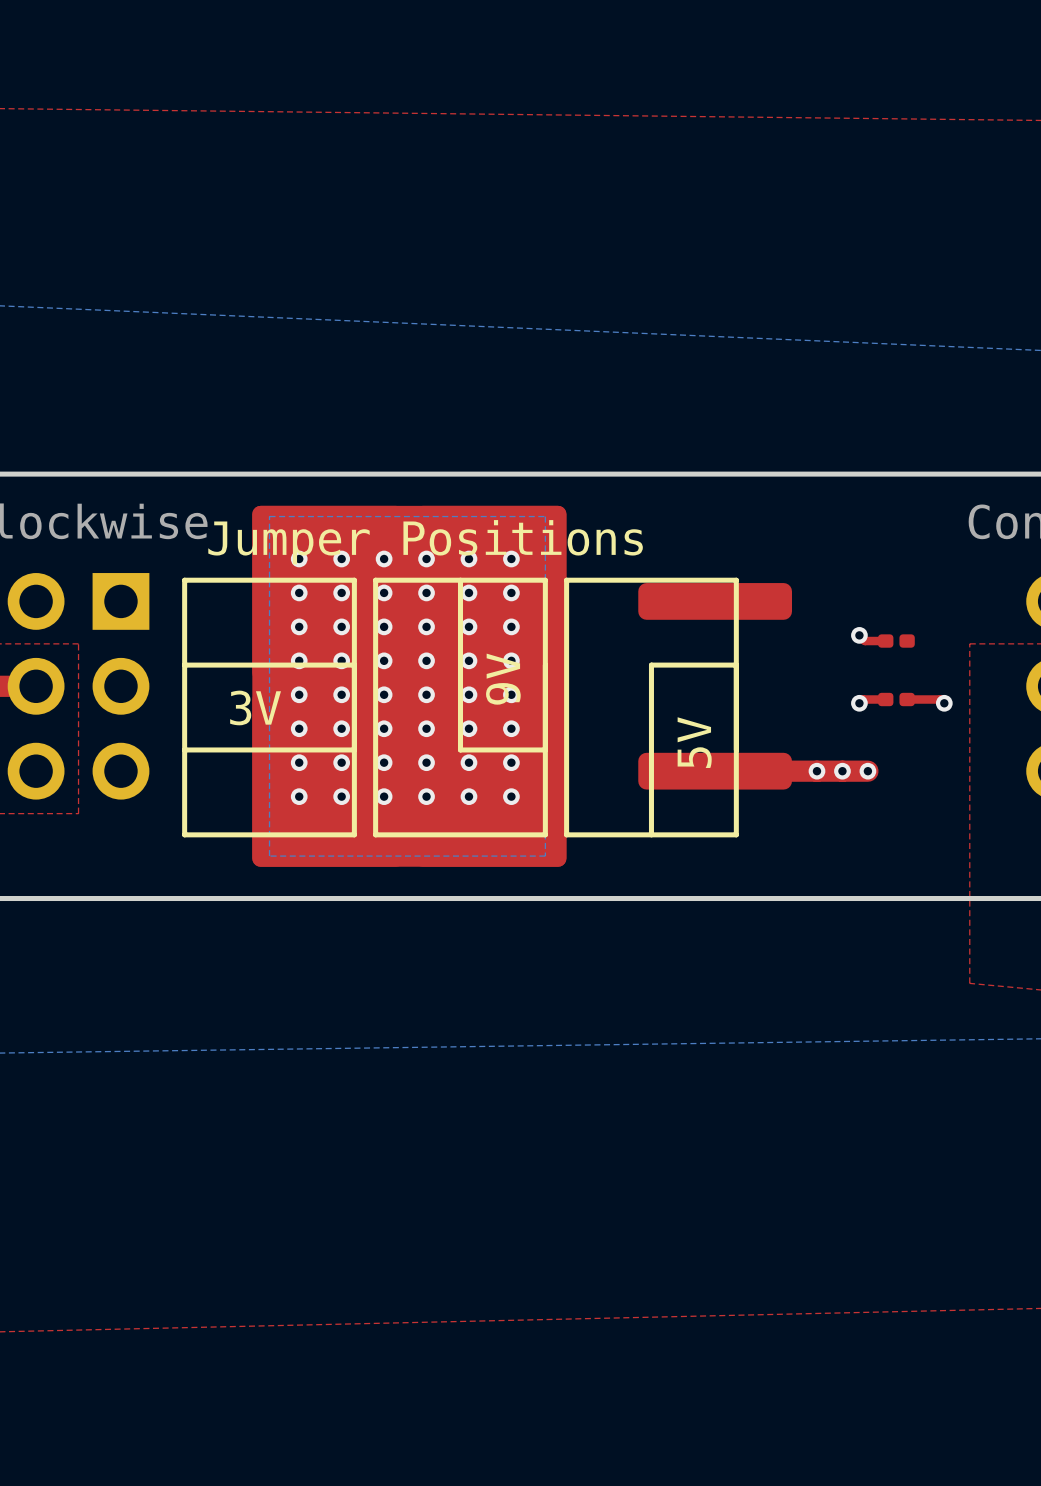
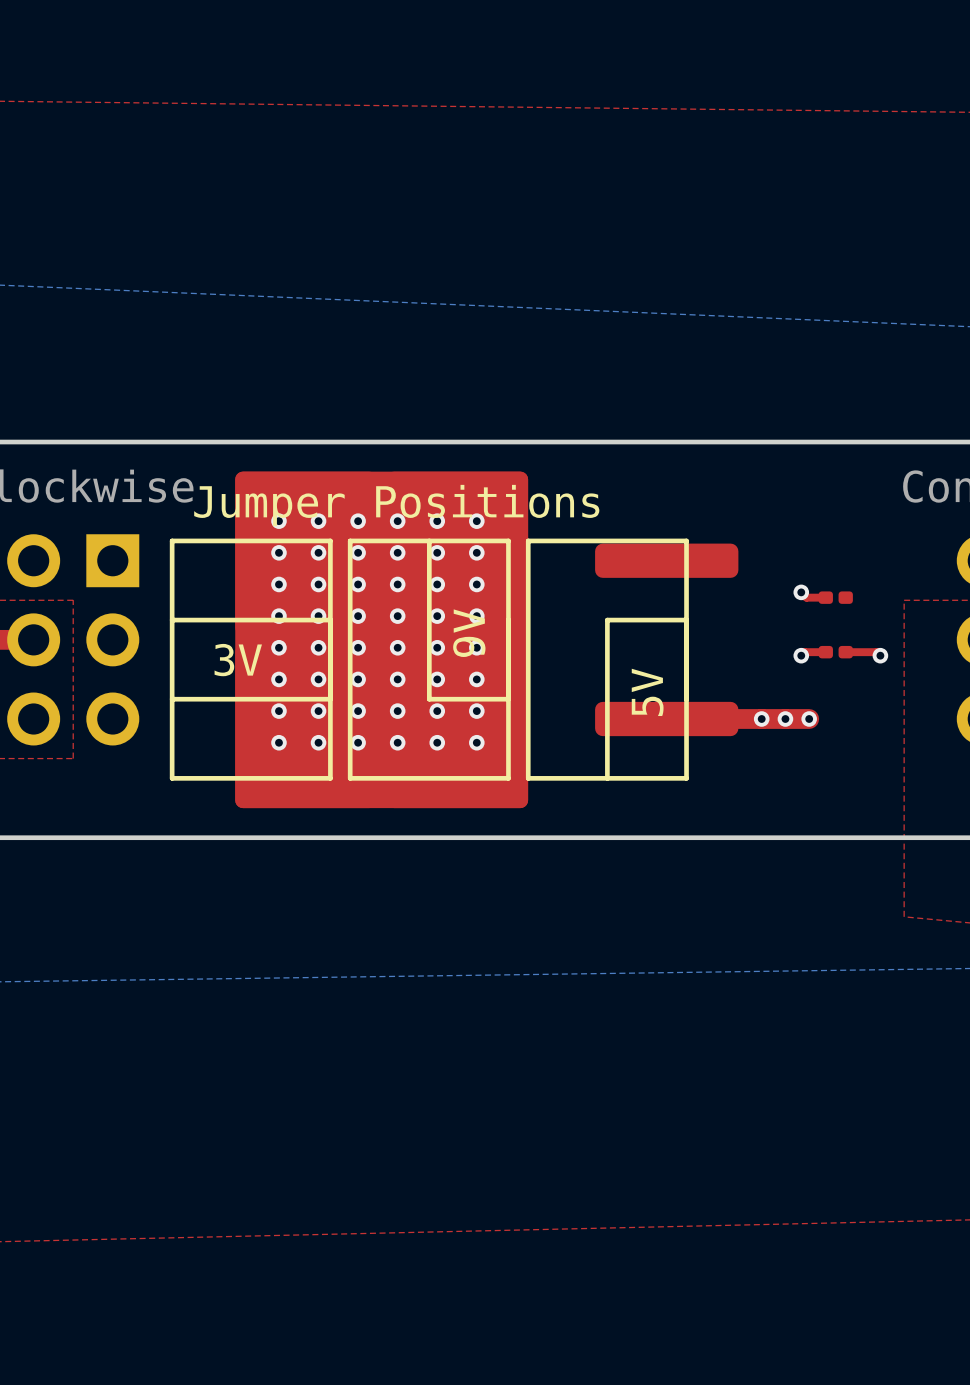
bottom zone outline: (545, 516) (545, 856) (269, 856) (269, 516) (545, 516) -> none

